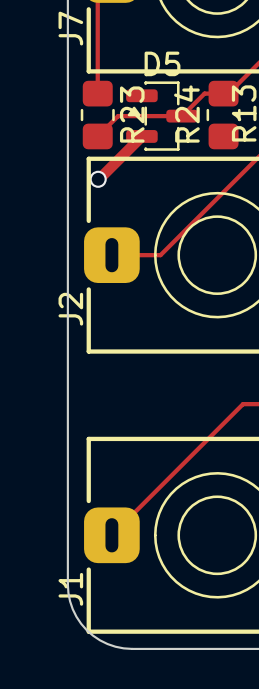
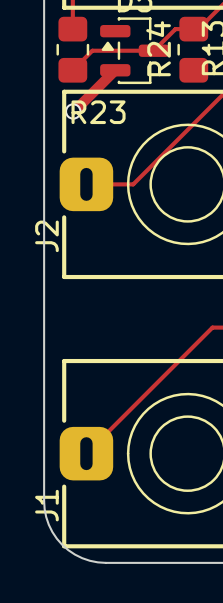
R23 name rotation: 0° (132, 114) -> 90° clockwise (98, 112)

